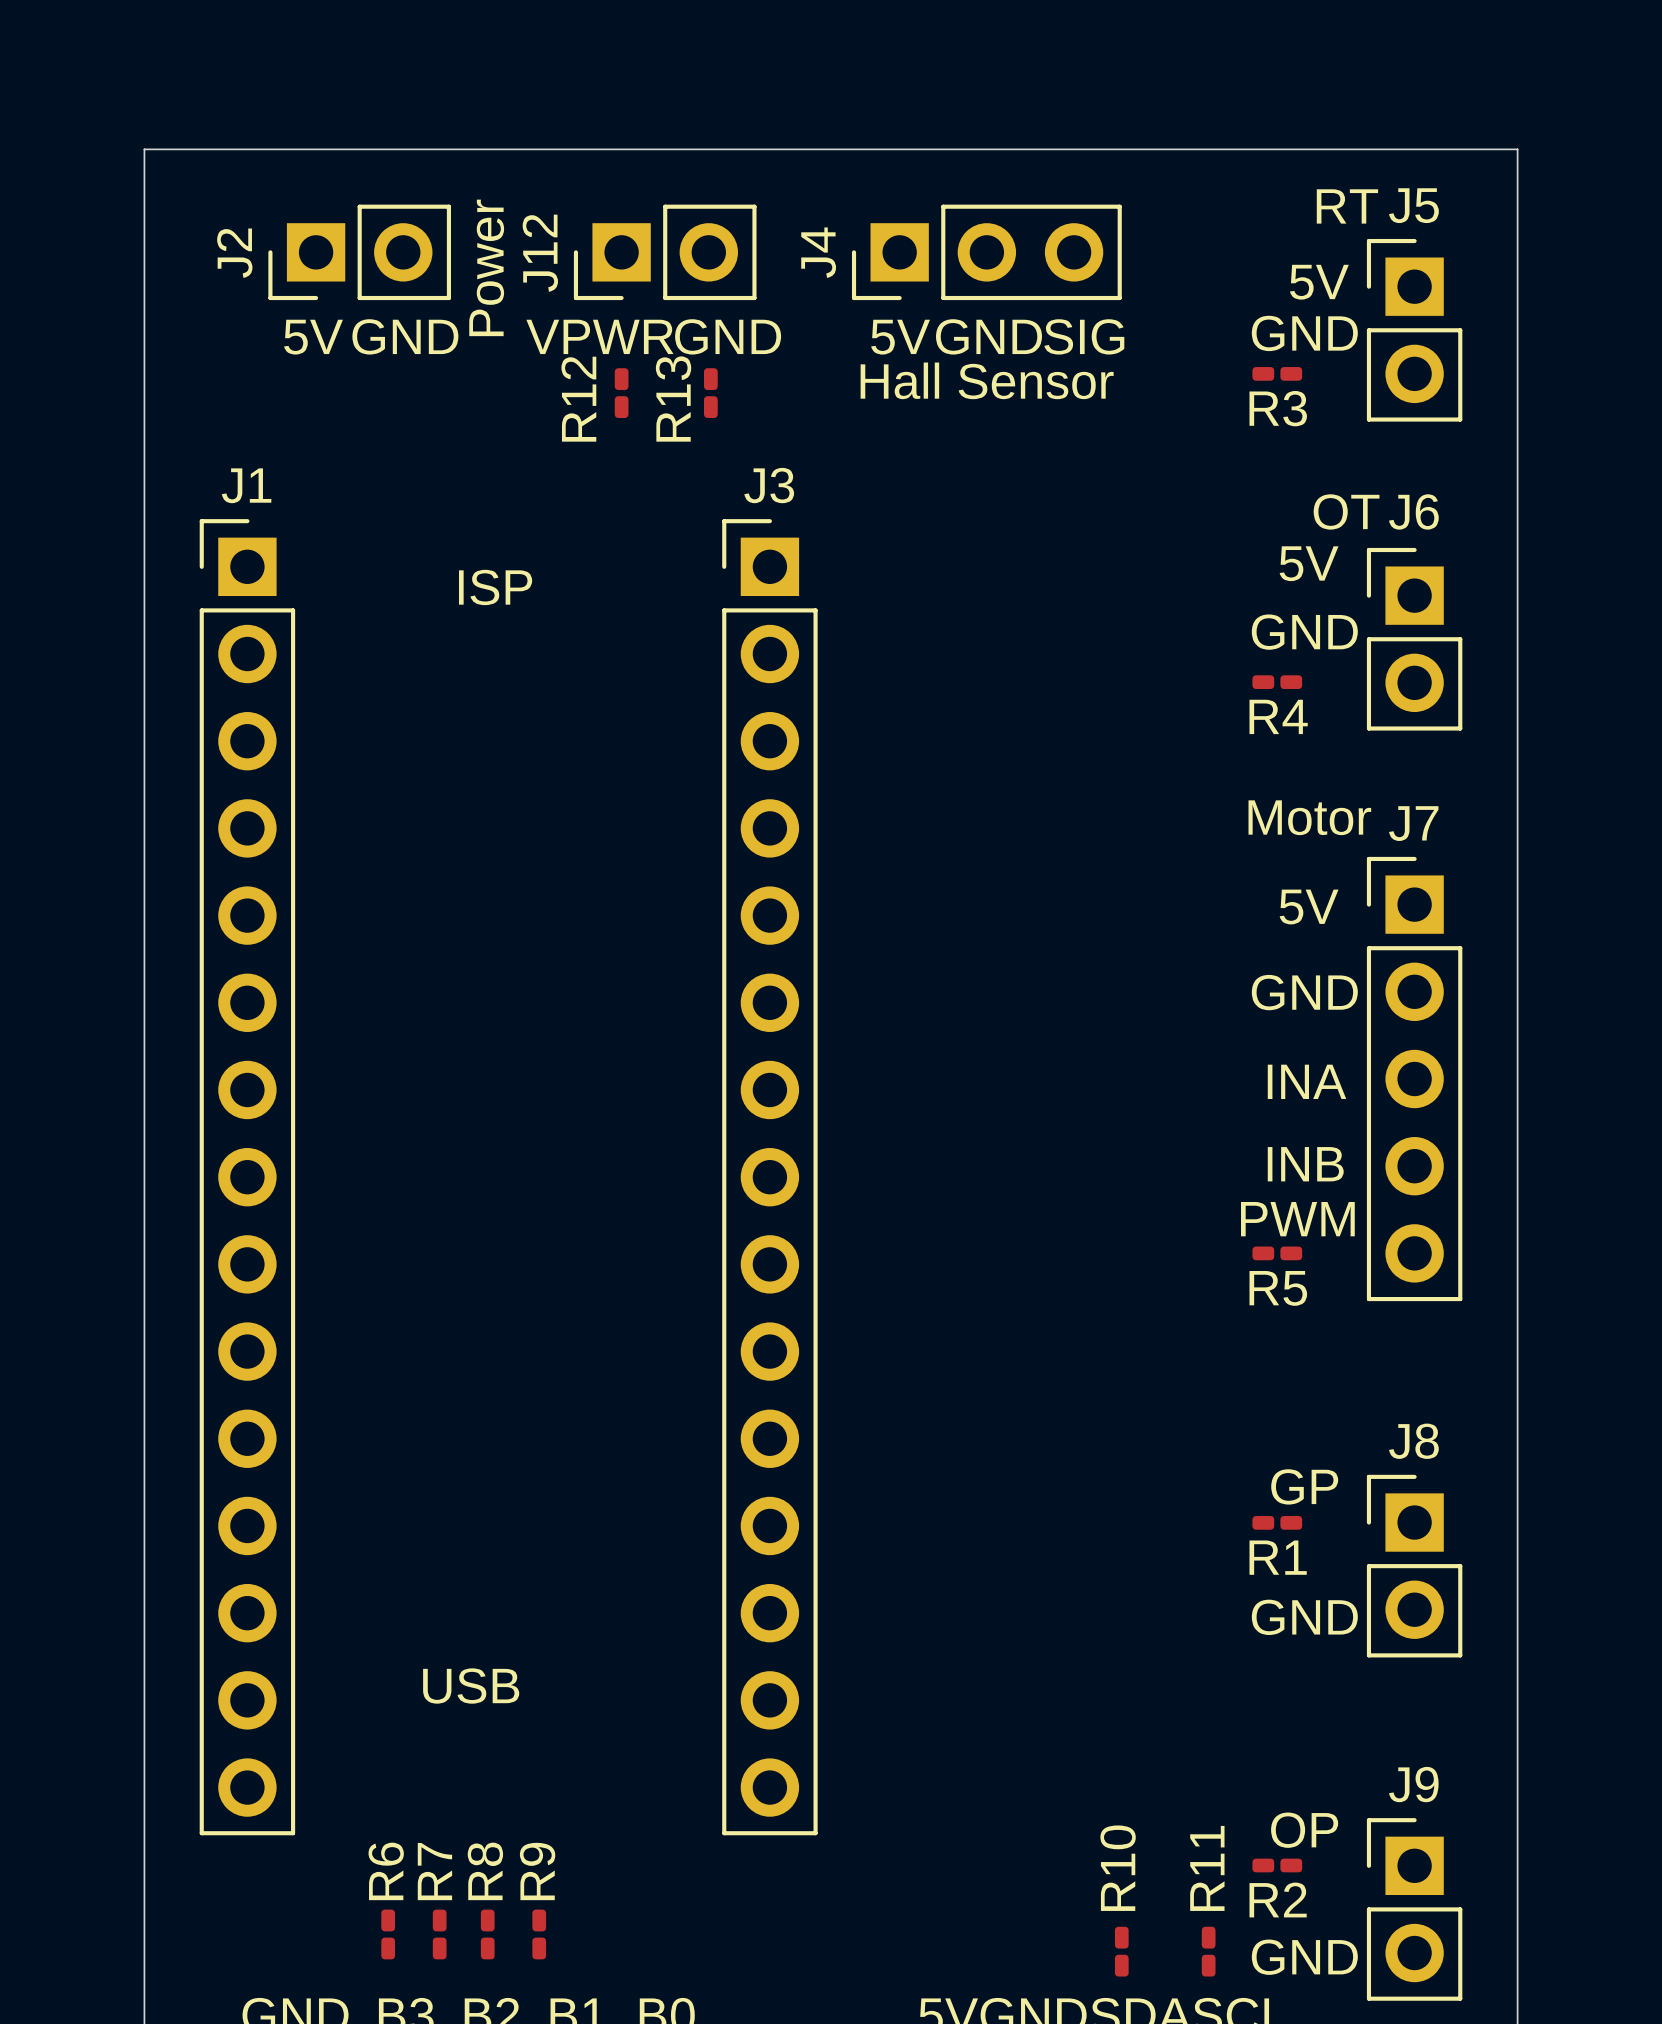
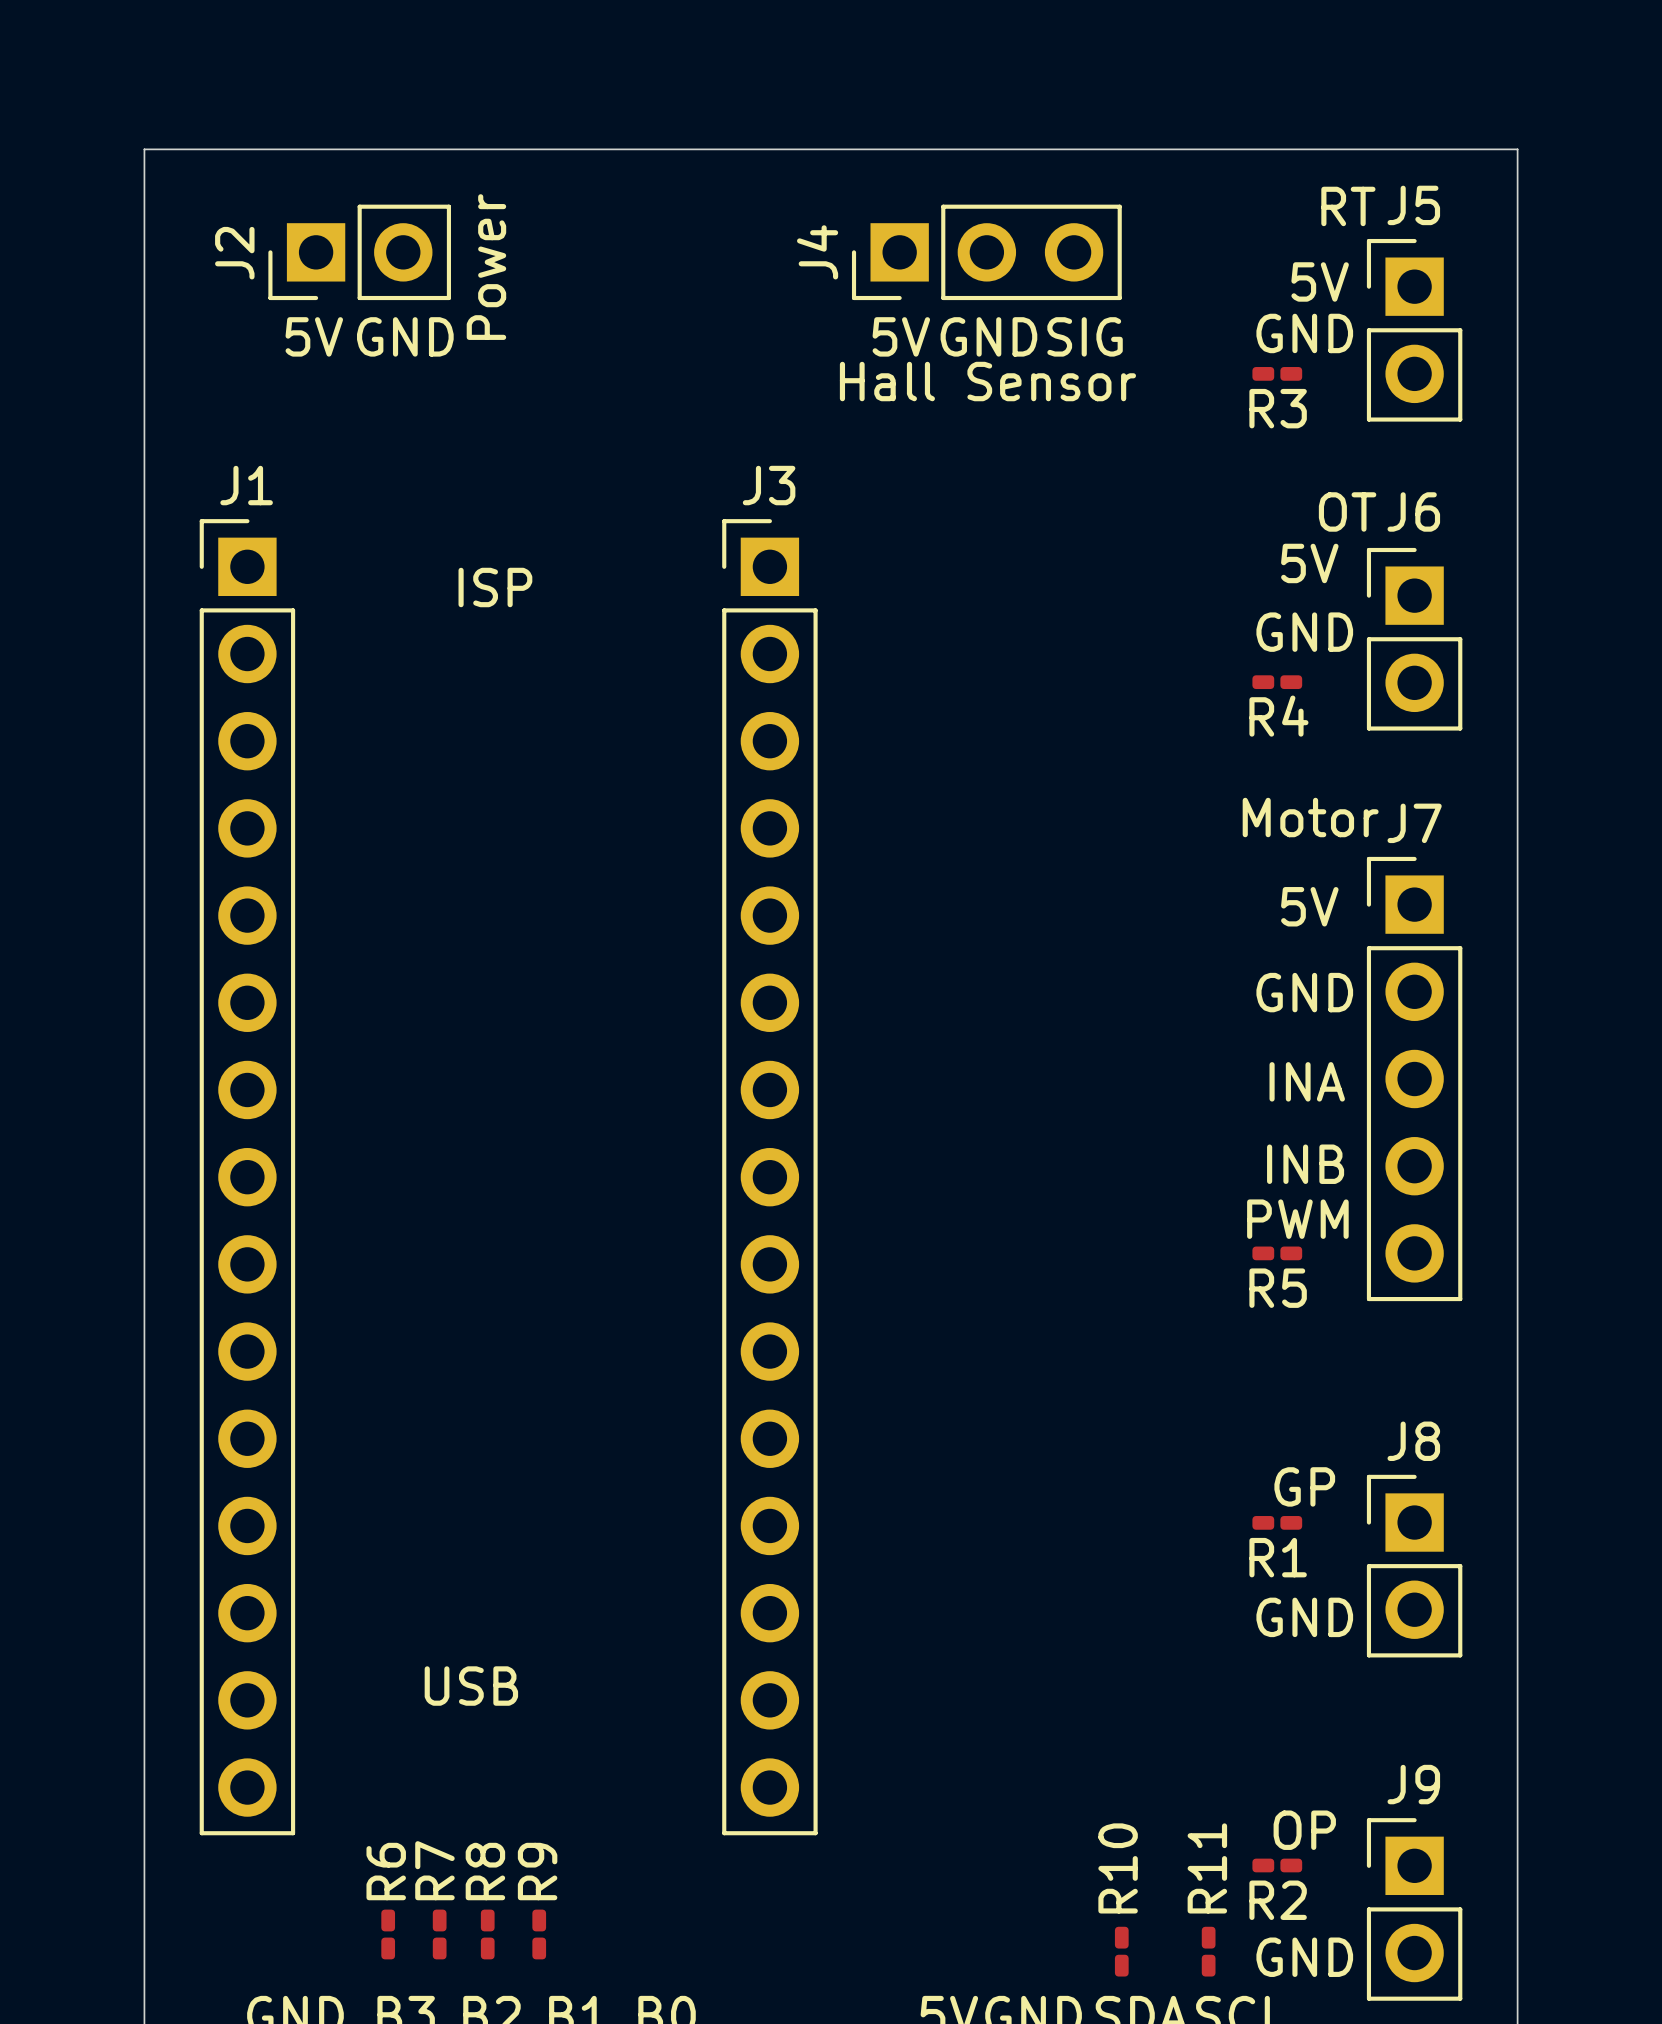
J12: (665, 252) -> none
text: VPWR (599, 336) -> none
text: GND (728, 336) -> none
R12: (621, 393) -> none
R13: (710, 393) -> none

